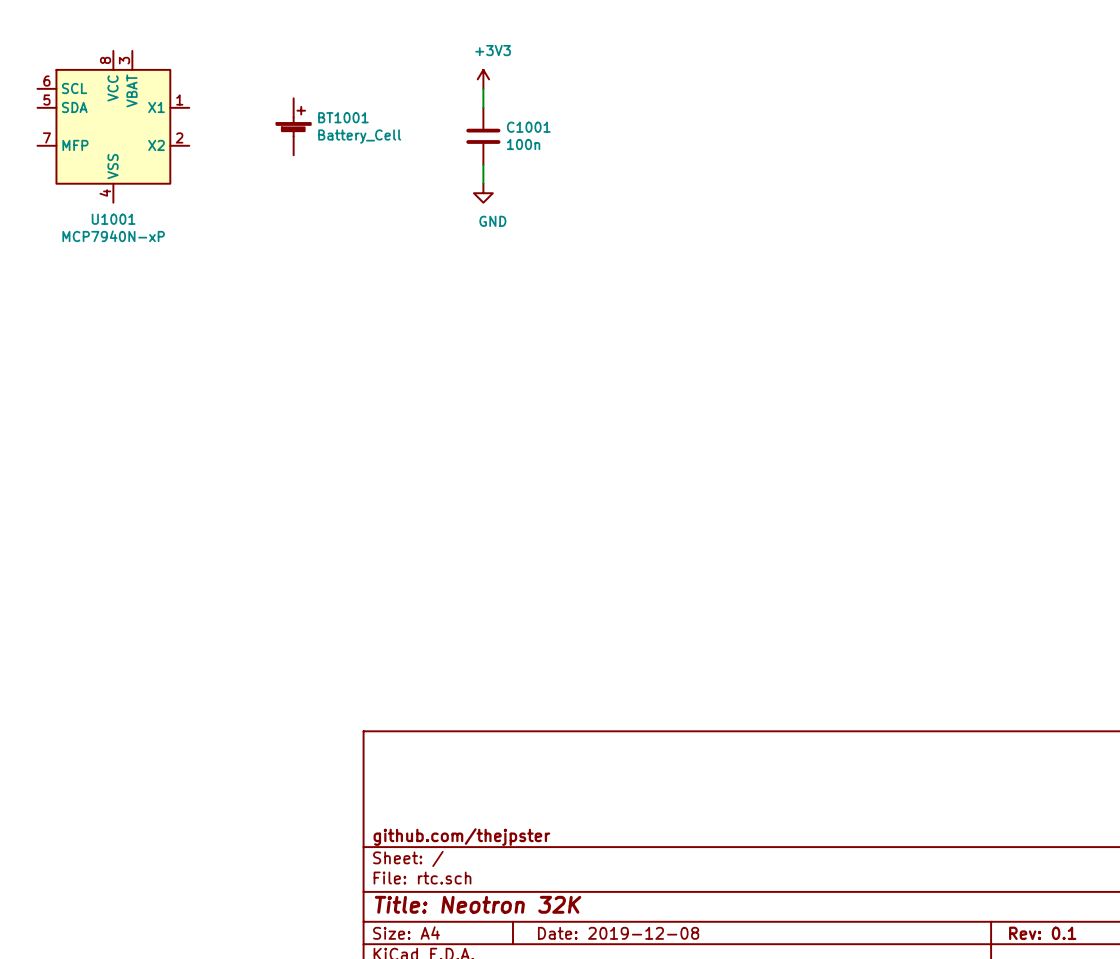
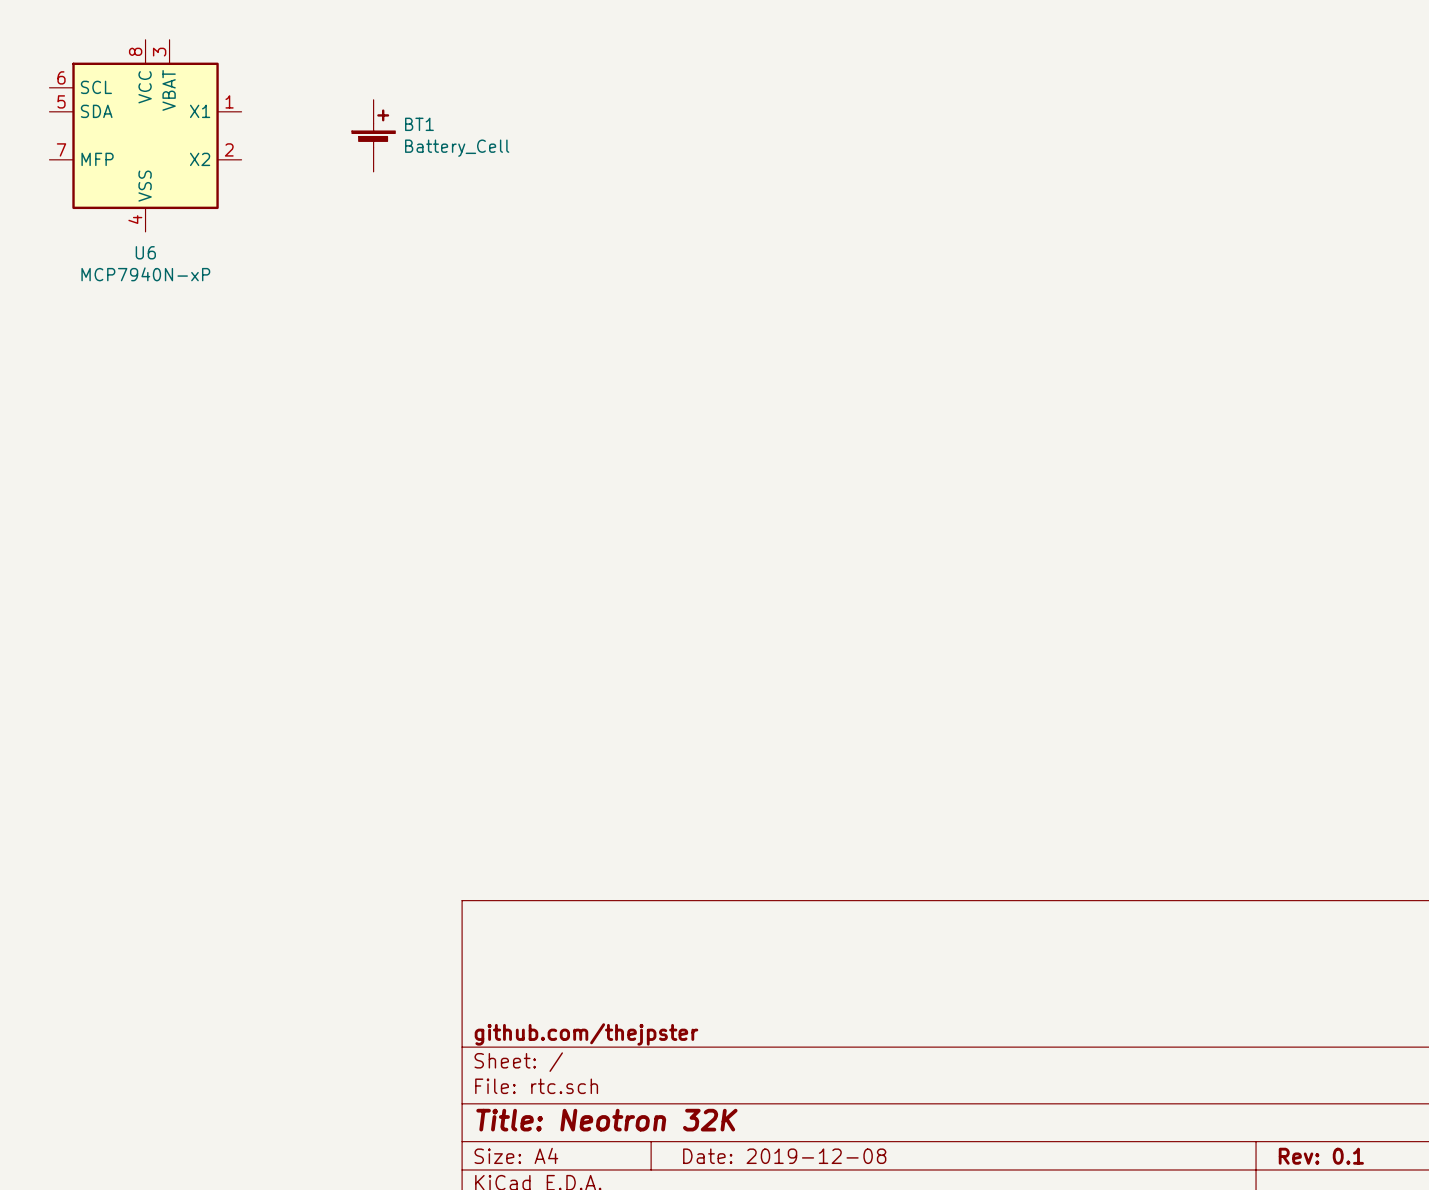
power symbol: +3V3 (483, 79) -> none
wire: (483, 88) (483, 107) -> none
BT1001 name: BT1001 (343, 117) -> BT1 (419, 124)
C1001: 100n (483, 136) -> none
wire: (483, 164) (483, 183) -> none
power symbol: GND (483, 193) -> none
U1001 name: U1001 (113, 219) -> U6 (145, 252)

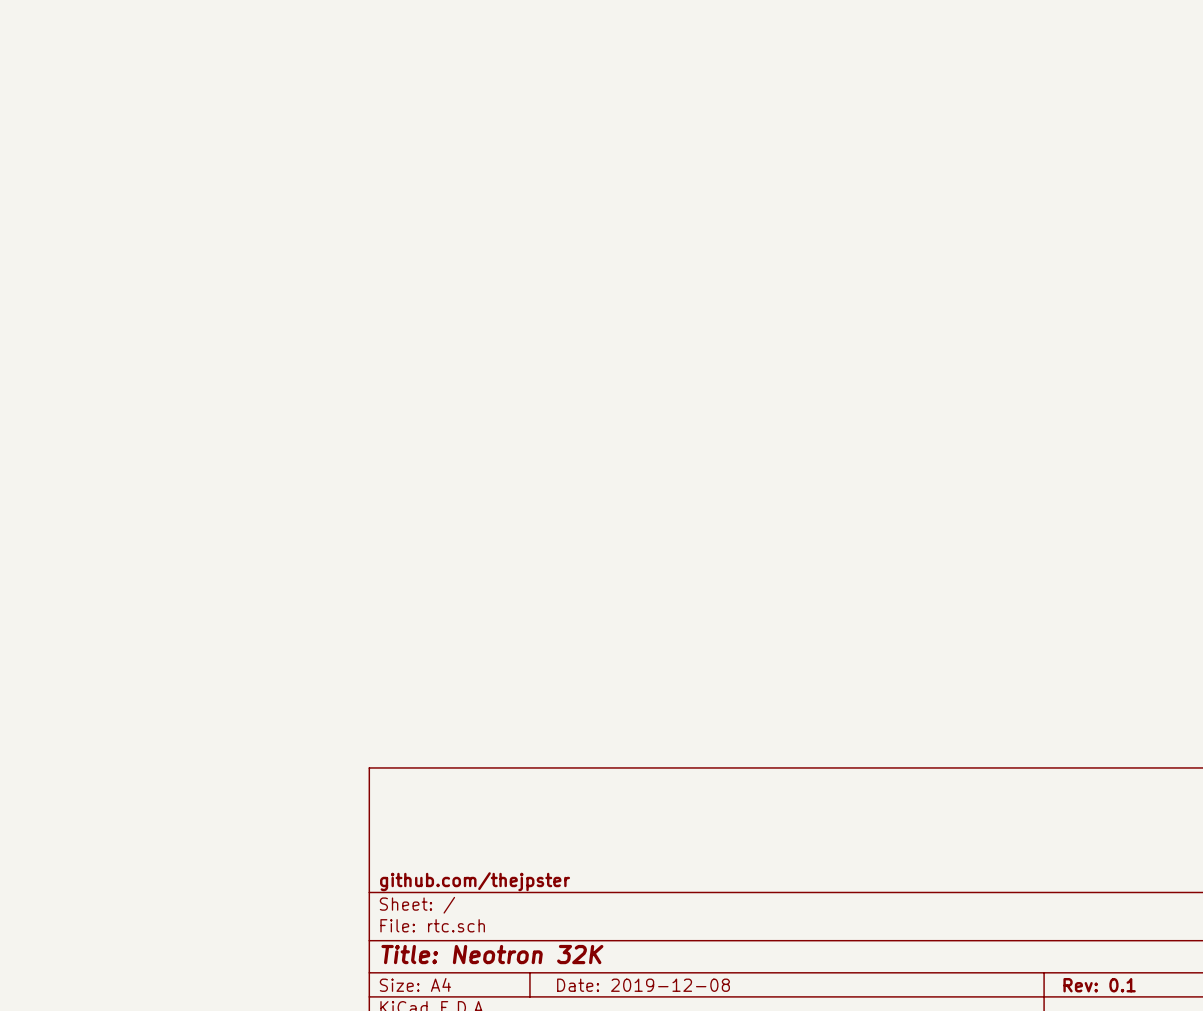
U6: MCP7940N-xP (145, 135) -> none
BT1: Battery_Cell (373, 135) -> none

